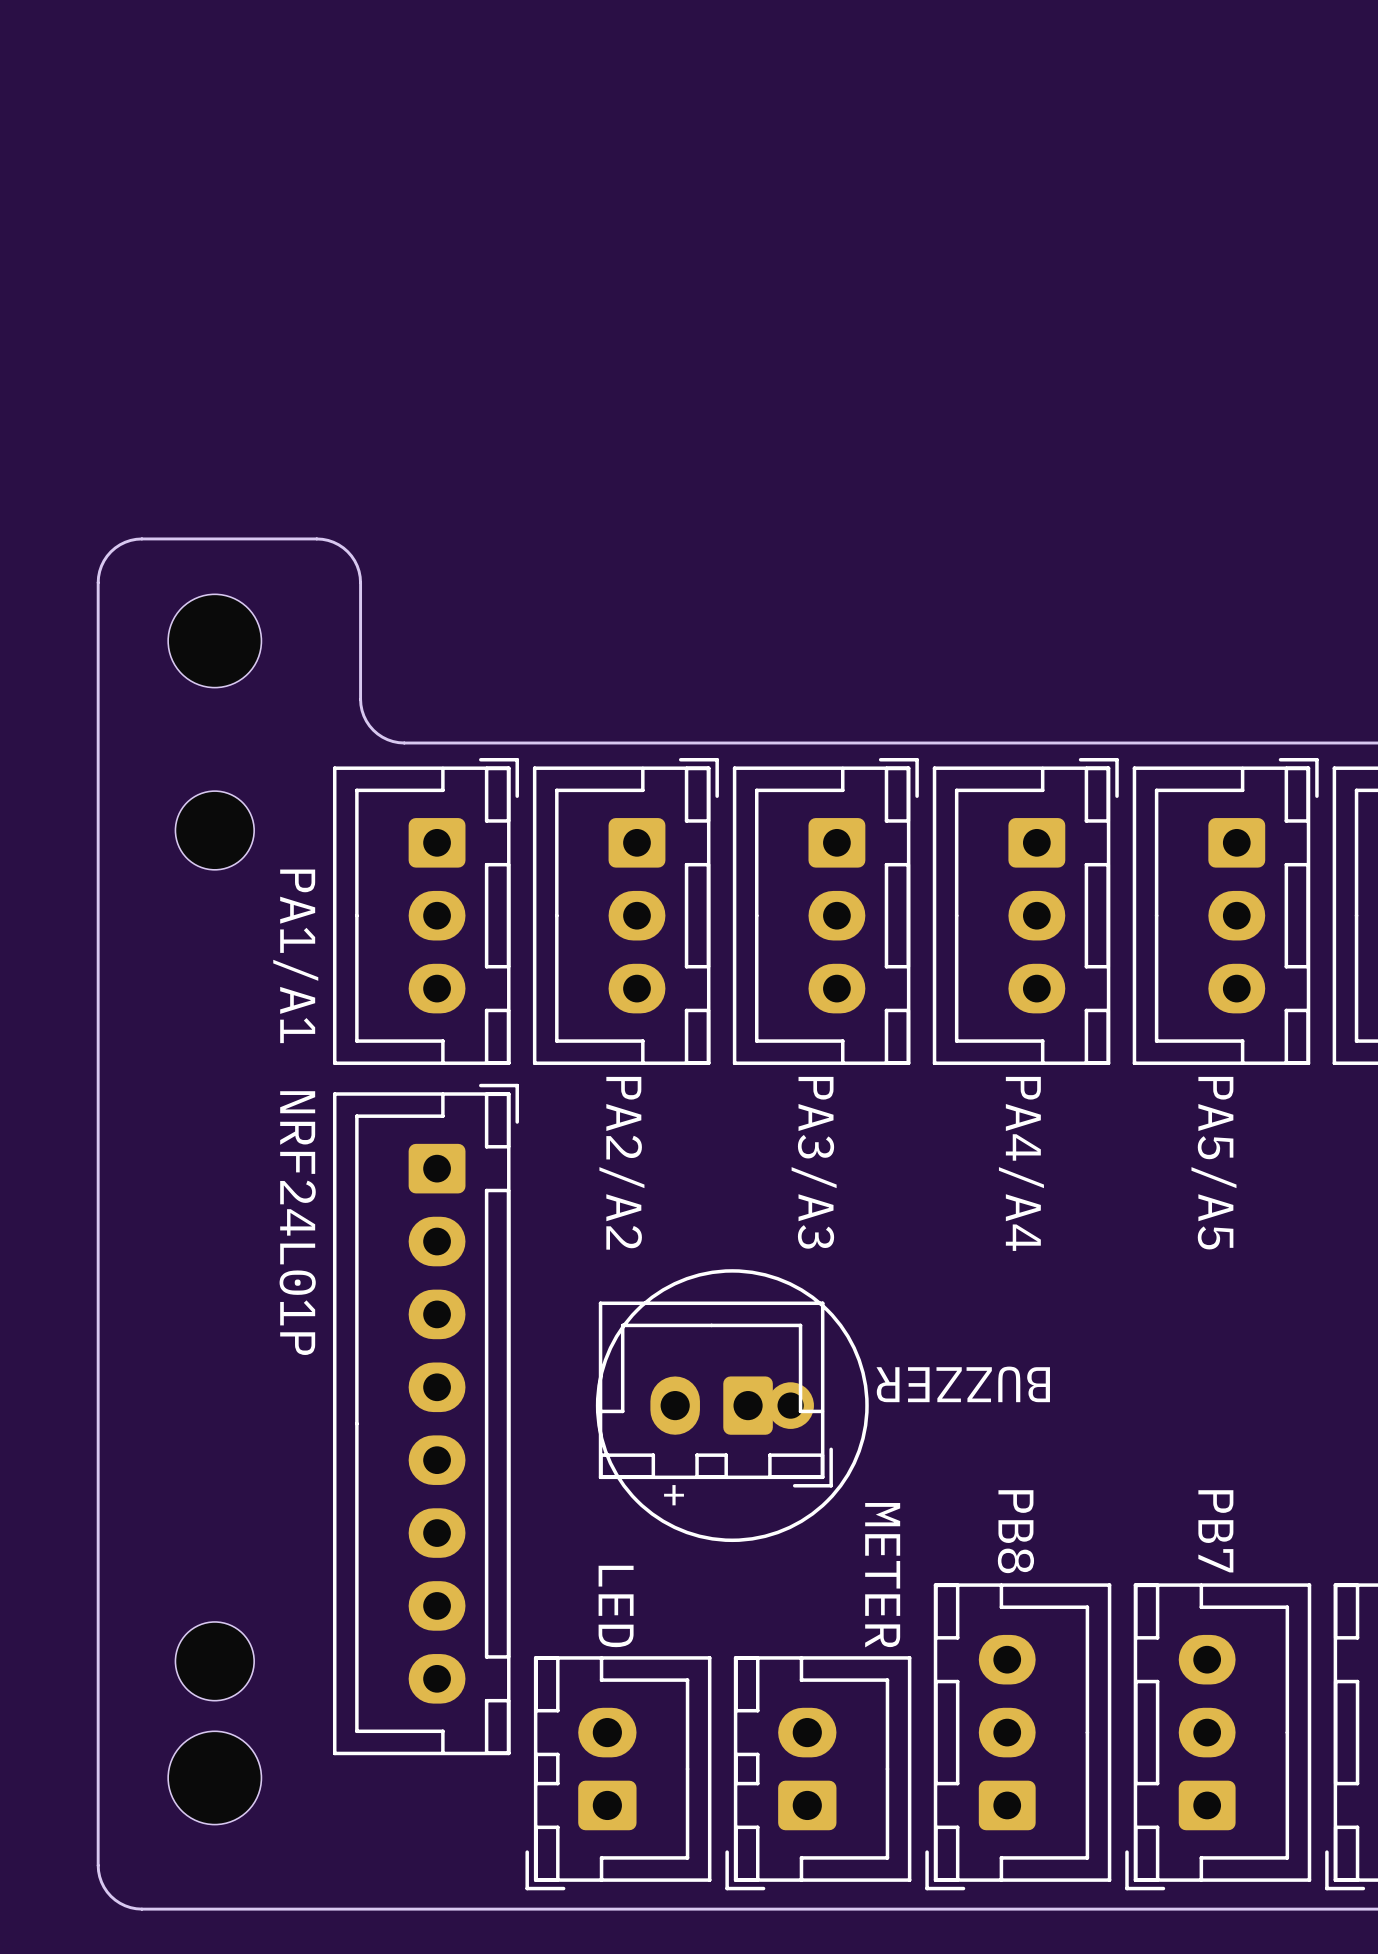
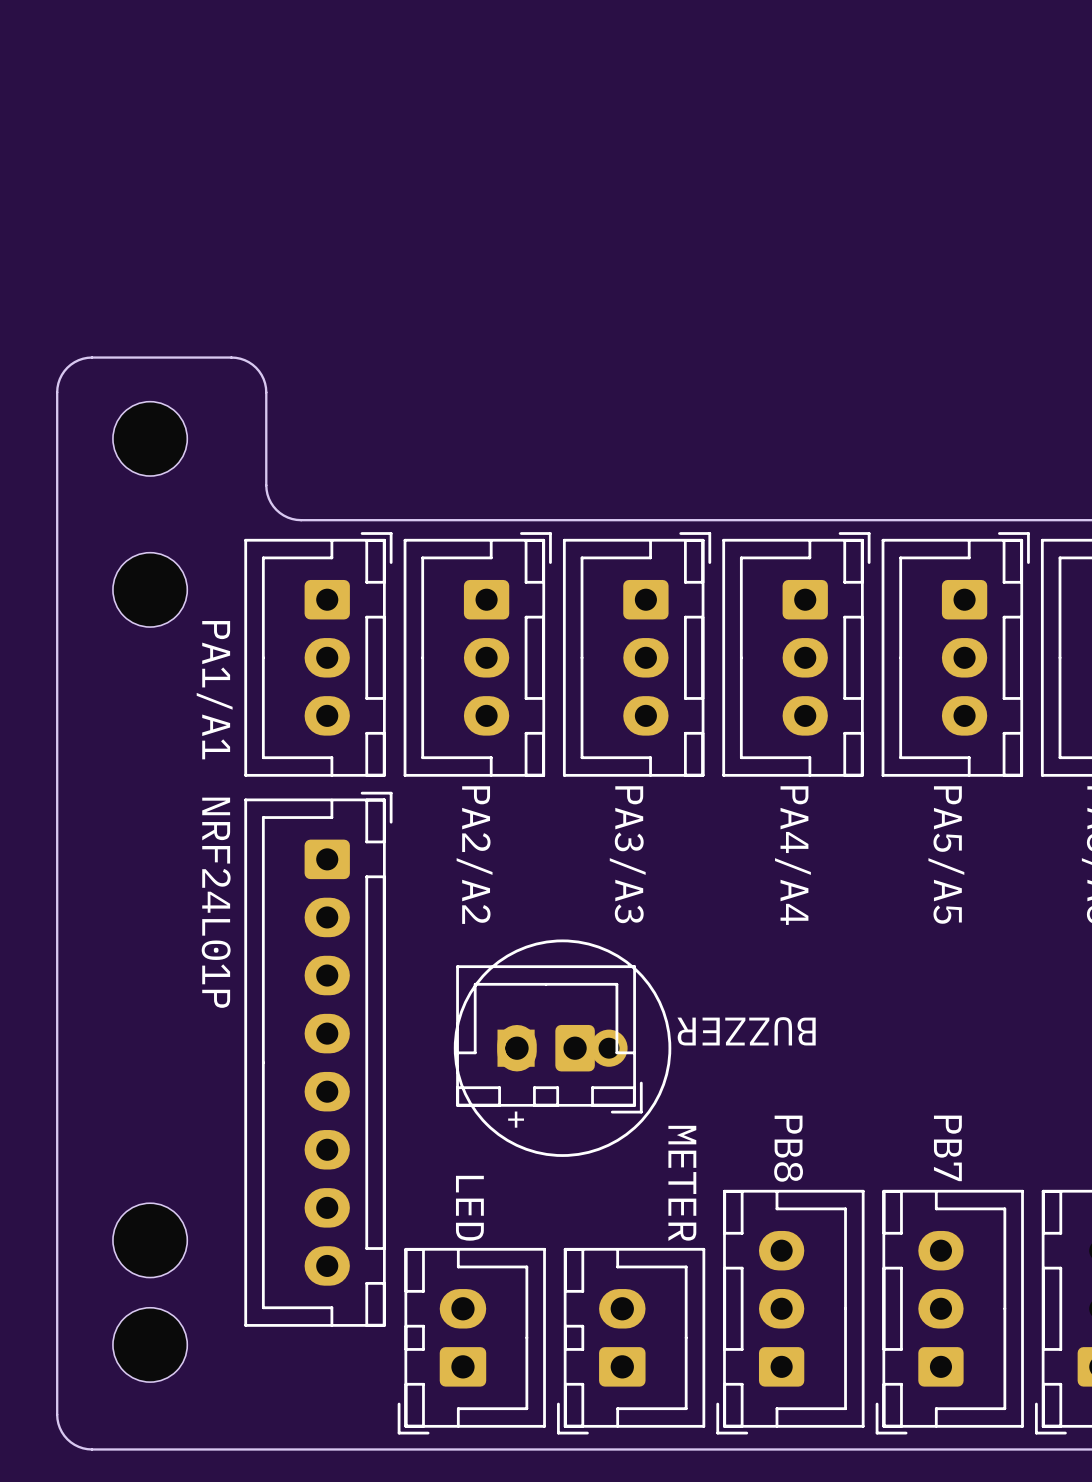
part footprint: [175, 791, 255, 870] -> [112, 552, 188, 628]
part footprint: [595, 1269, 869, 1543] -> [453, 939, 672, 1157]
part footprint: [175, 1621, 255, 1701] -> [112, 1203, 188, 1278]

